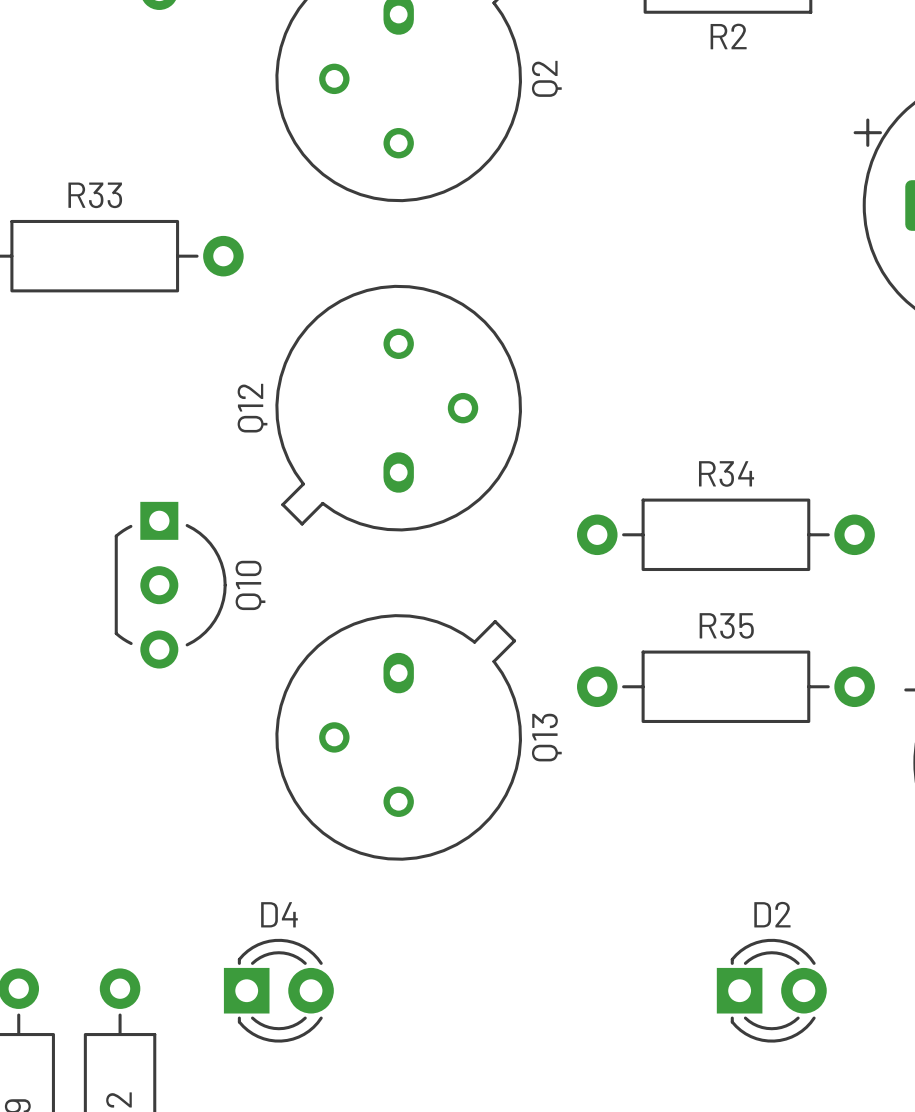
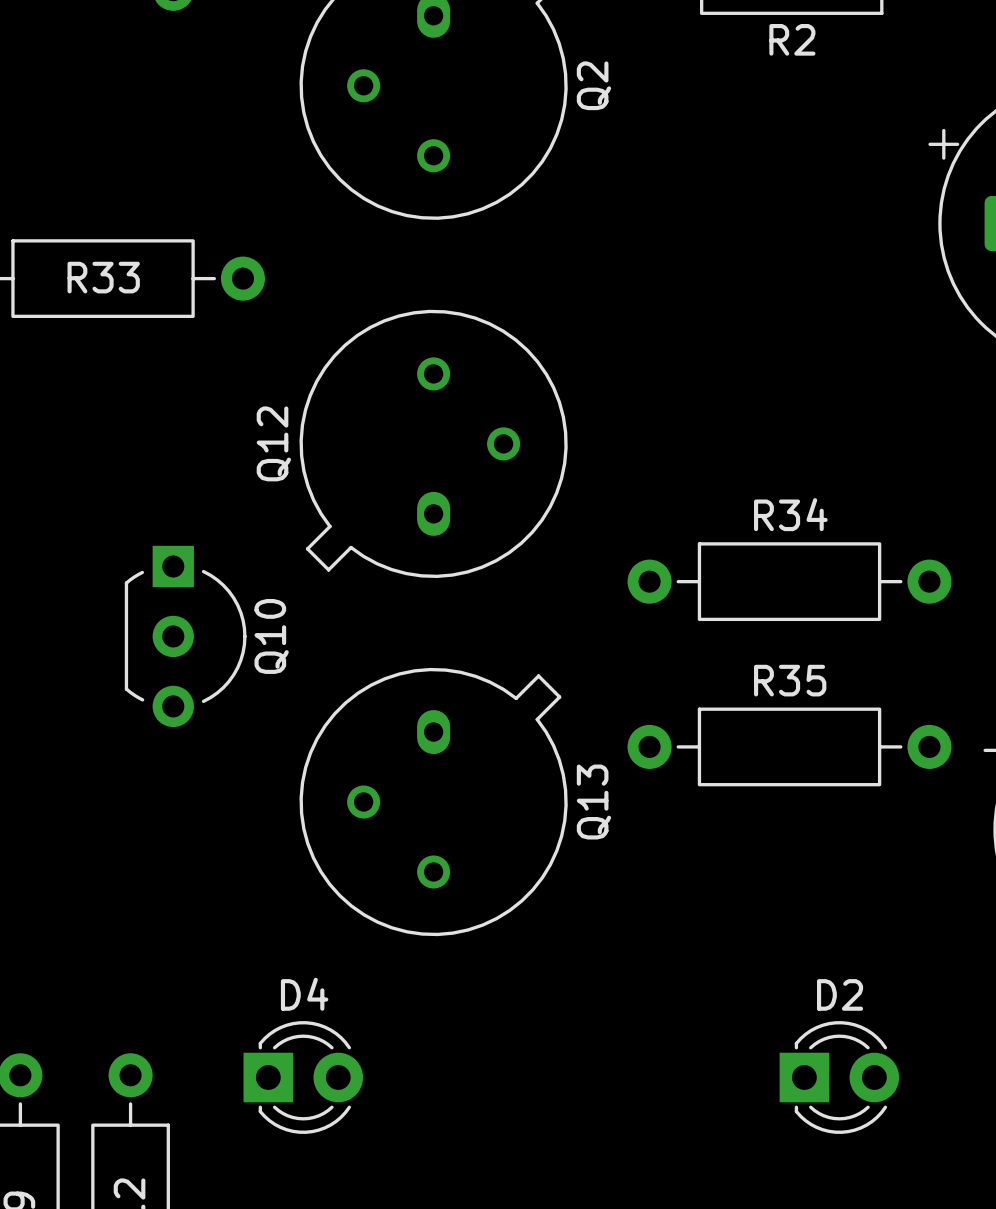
R33 name position: R33 (95, 195) -> R33 (103, 277)

